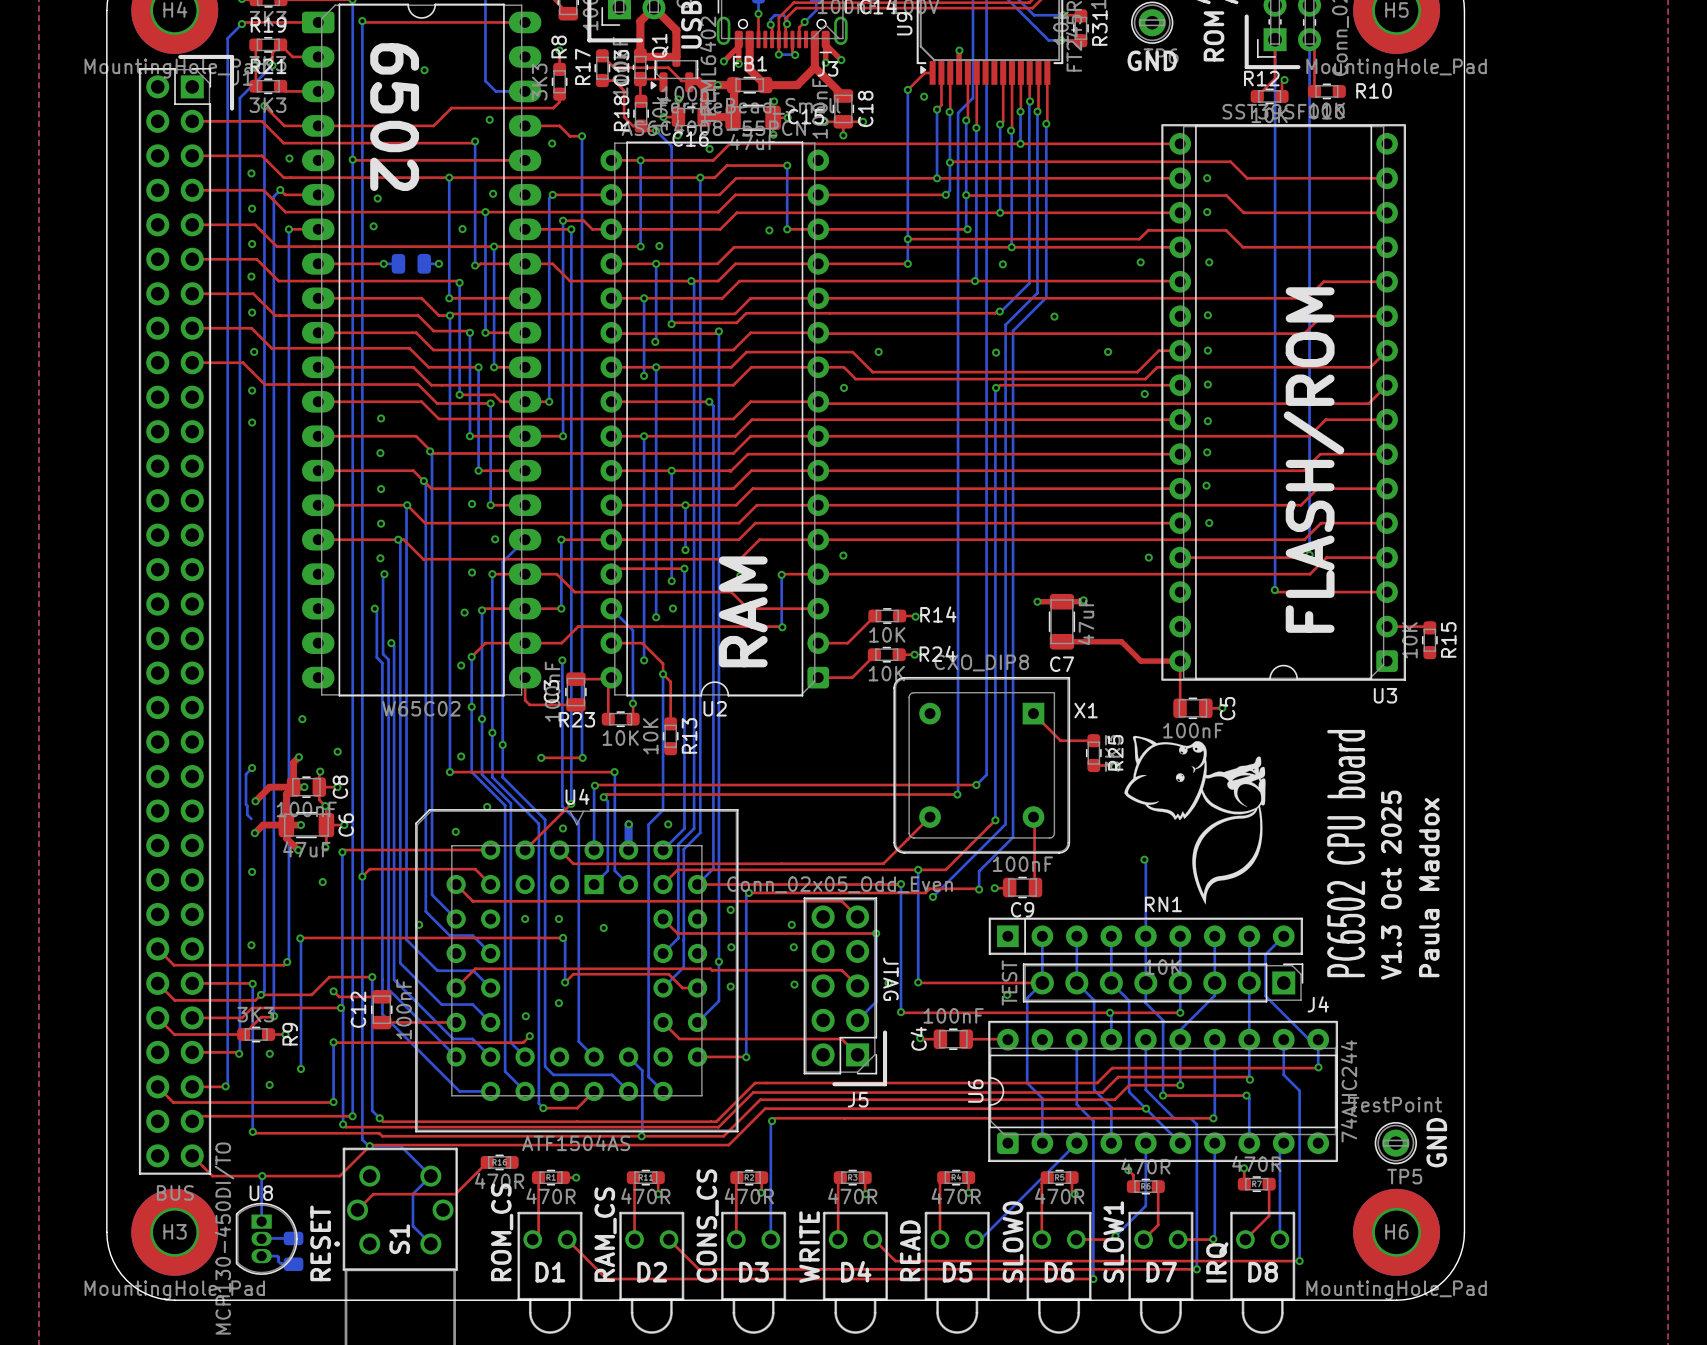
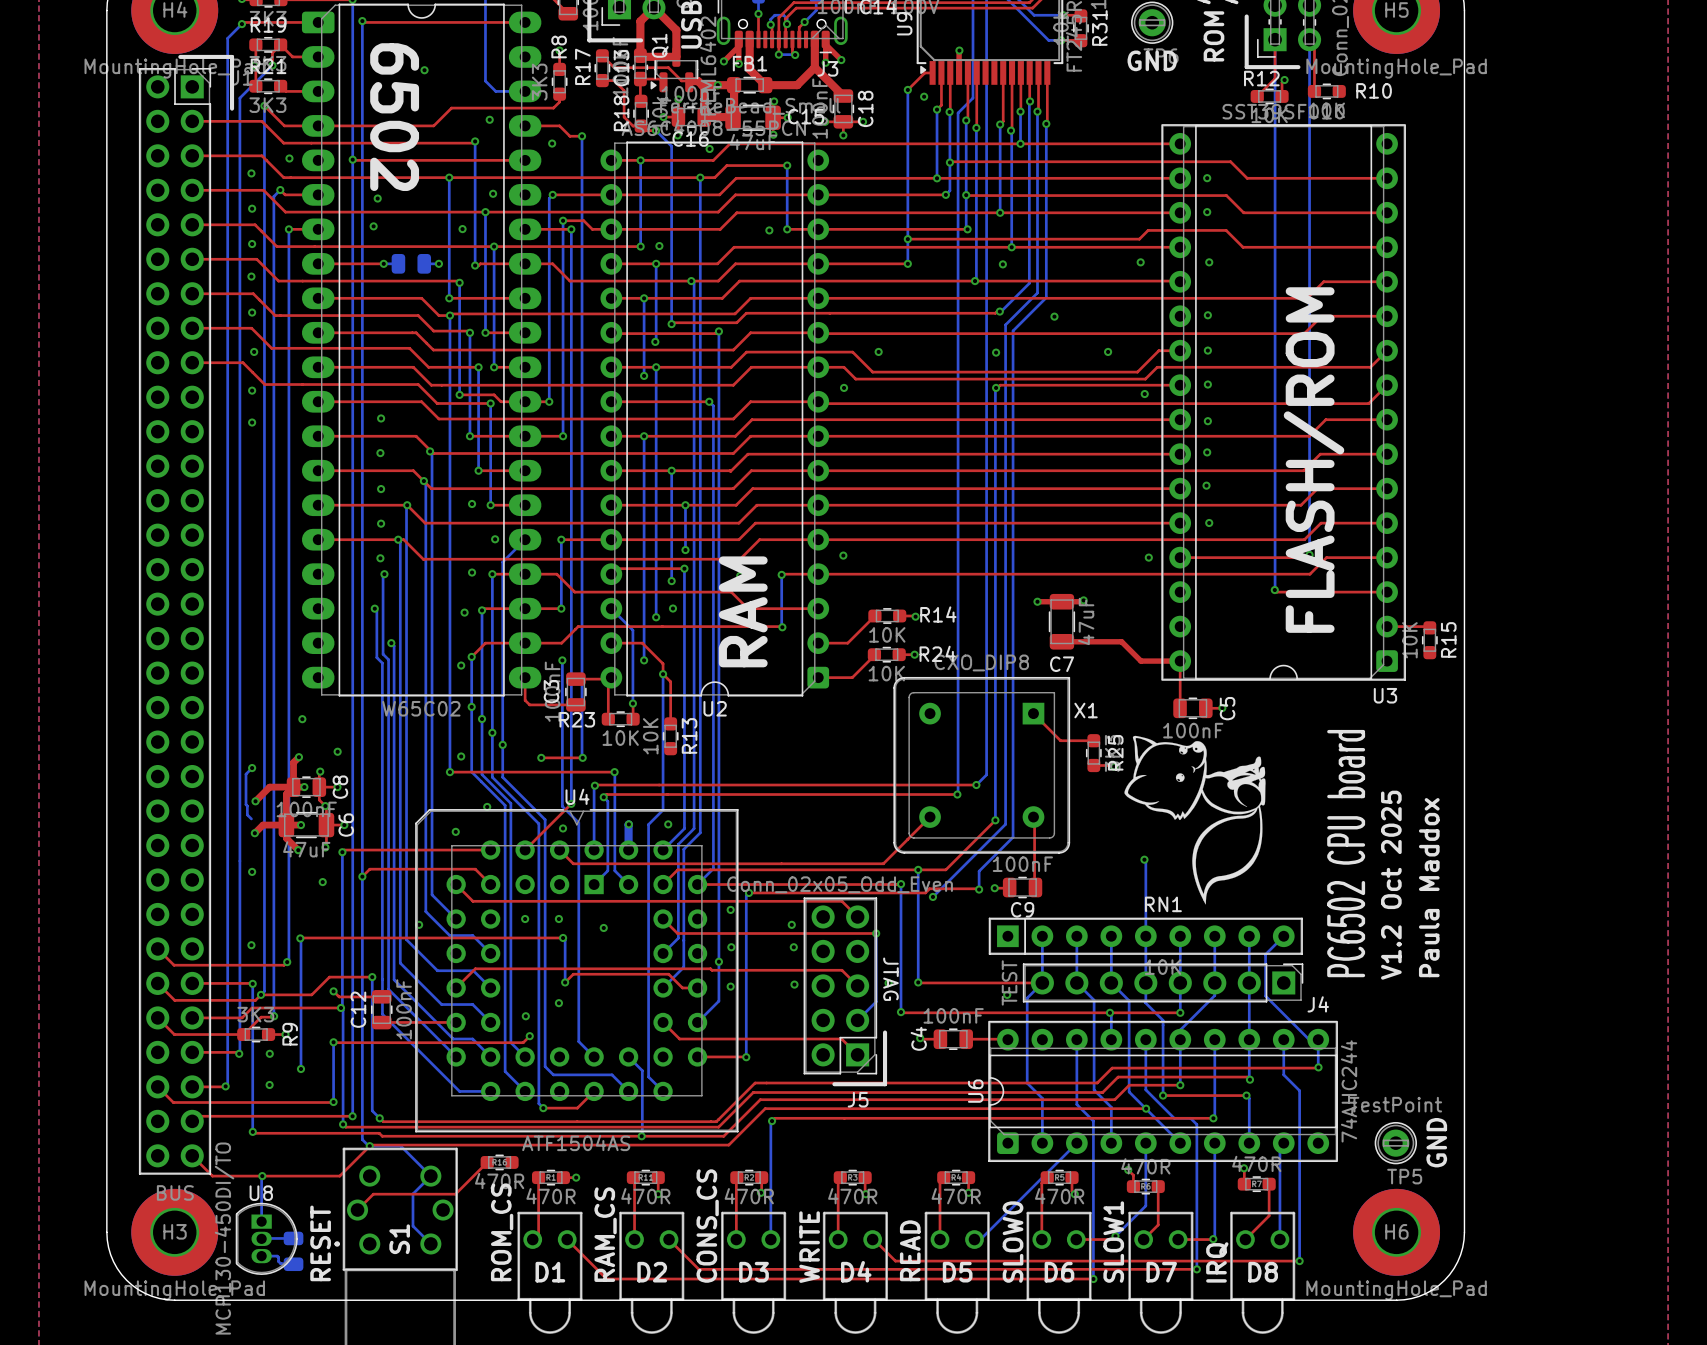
text: V1.3 Oct 2025 (1391, 885) -> V1.2 Oct 2025 (1391, 885)

